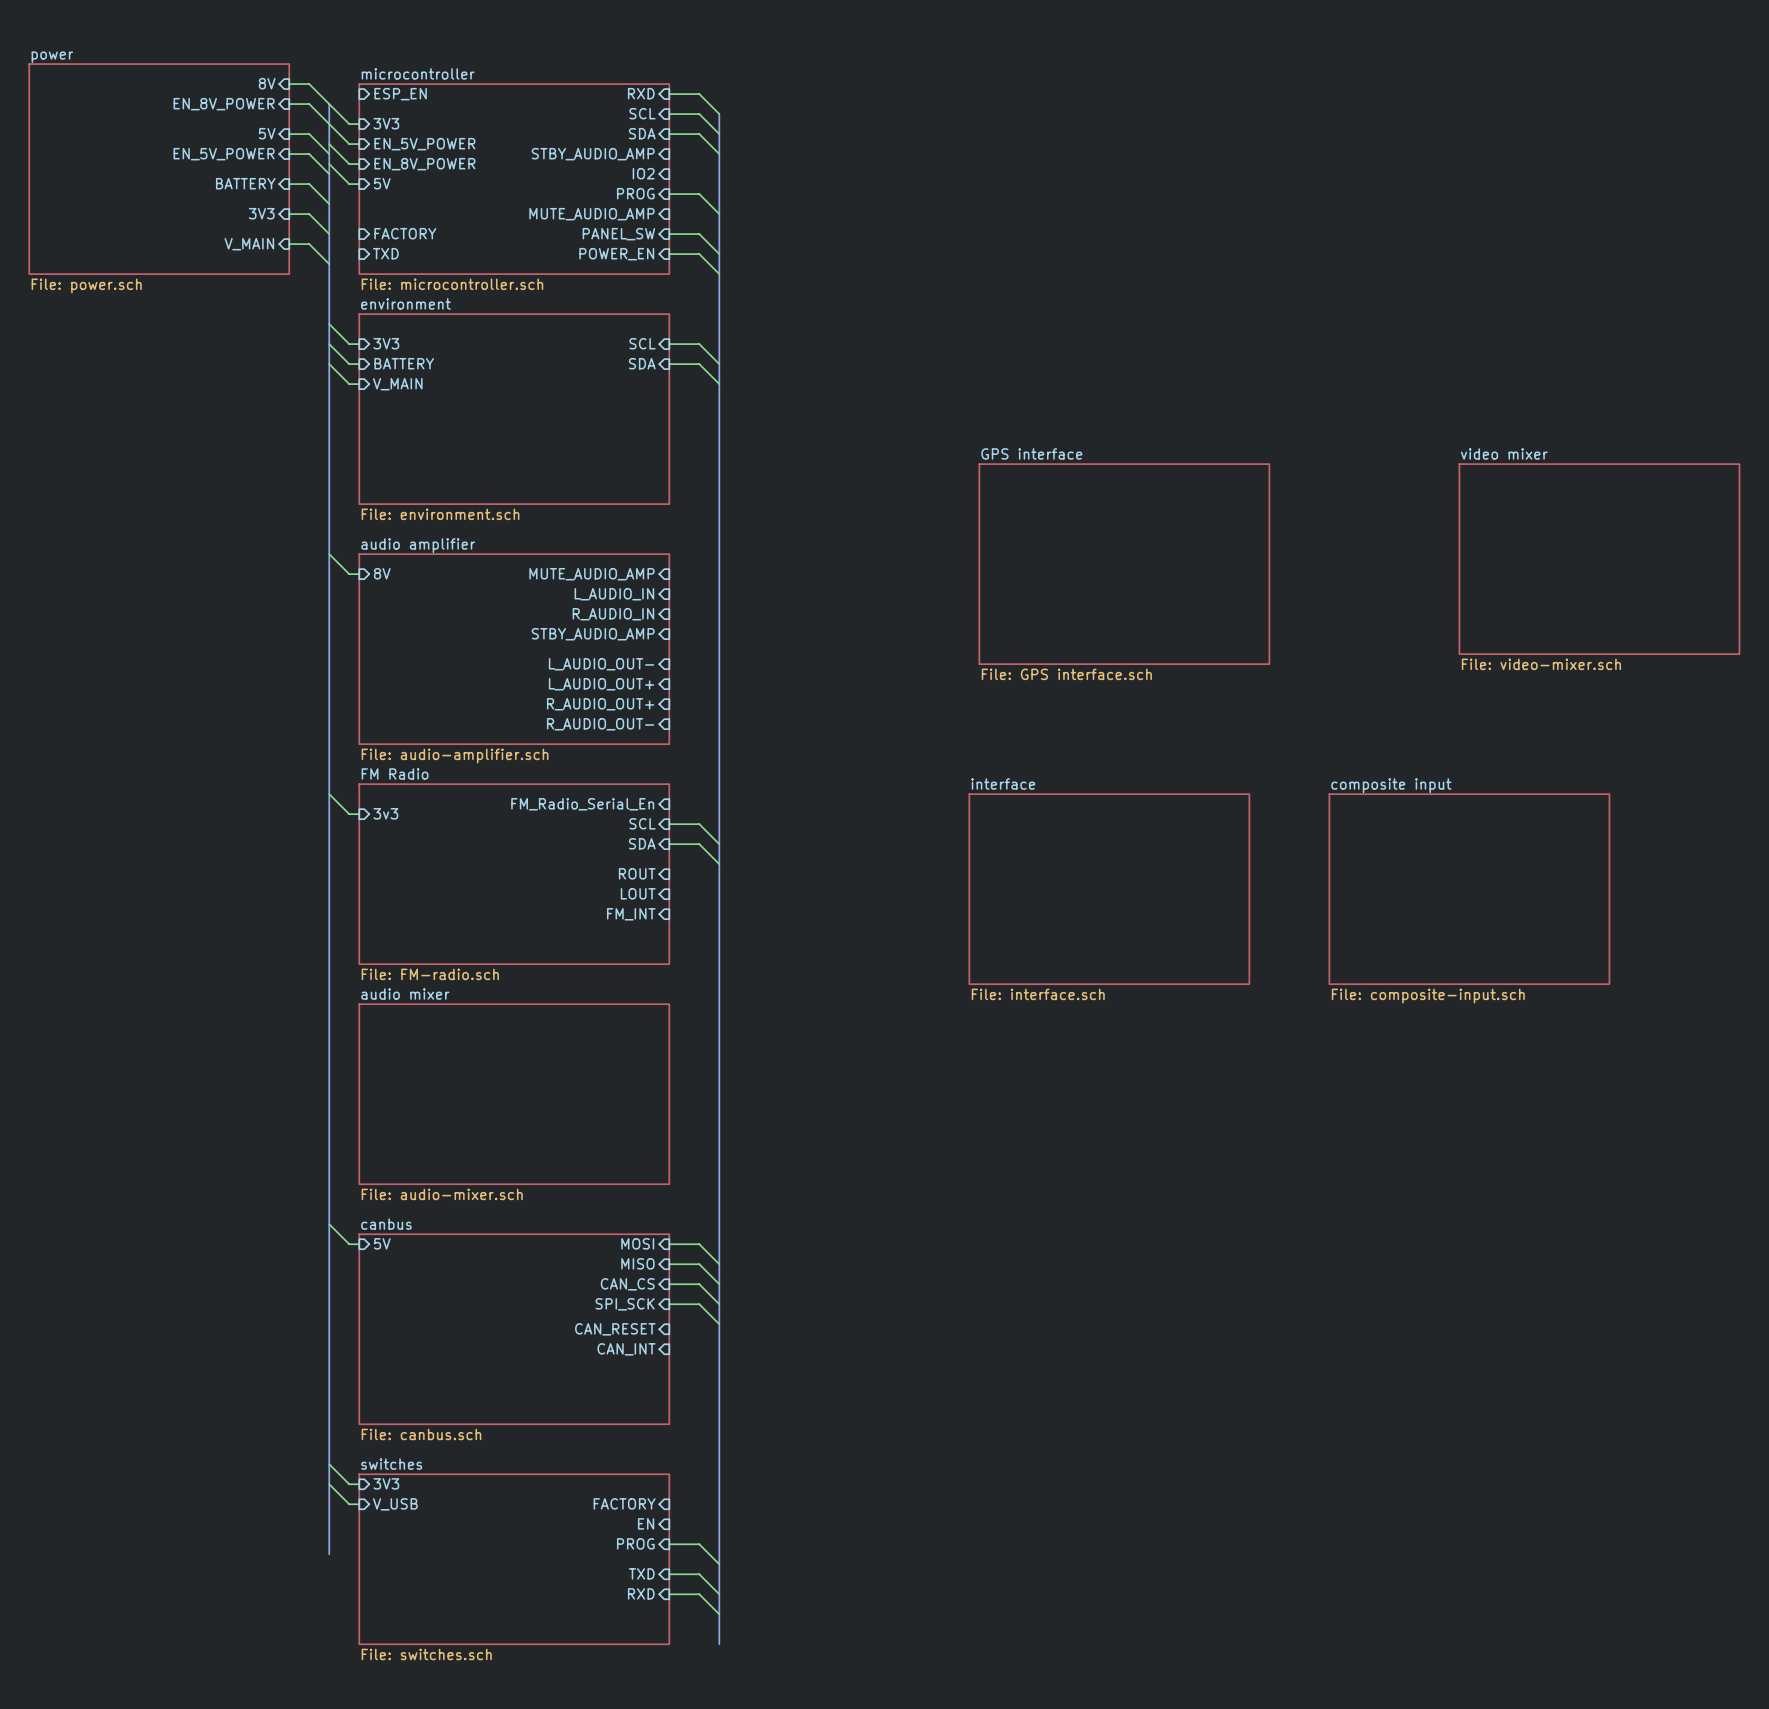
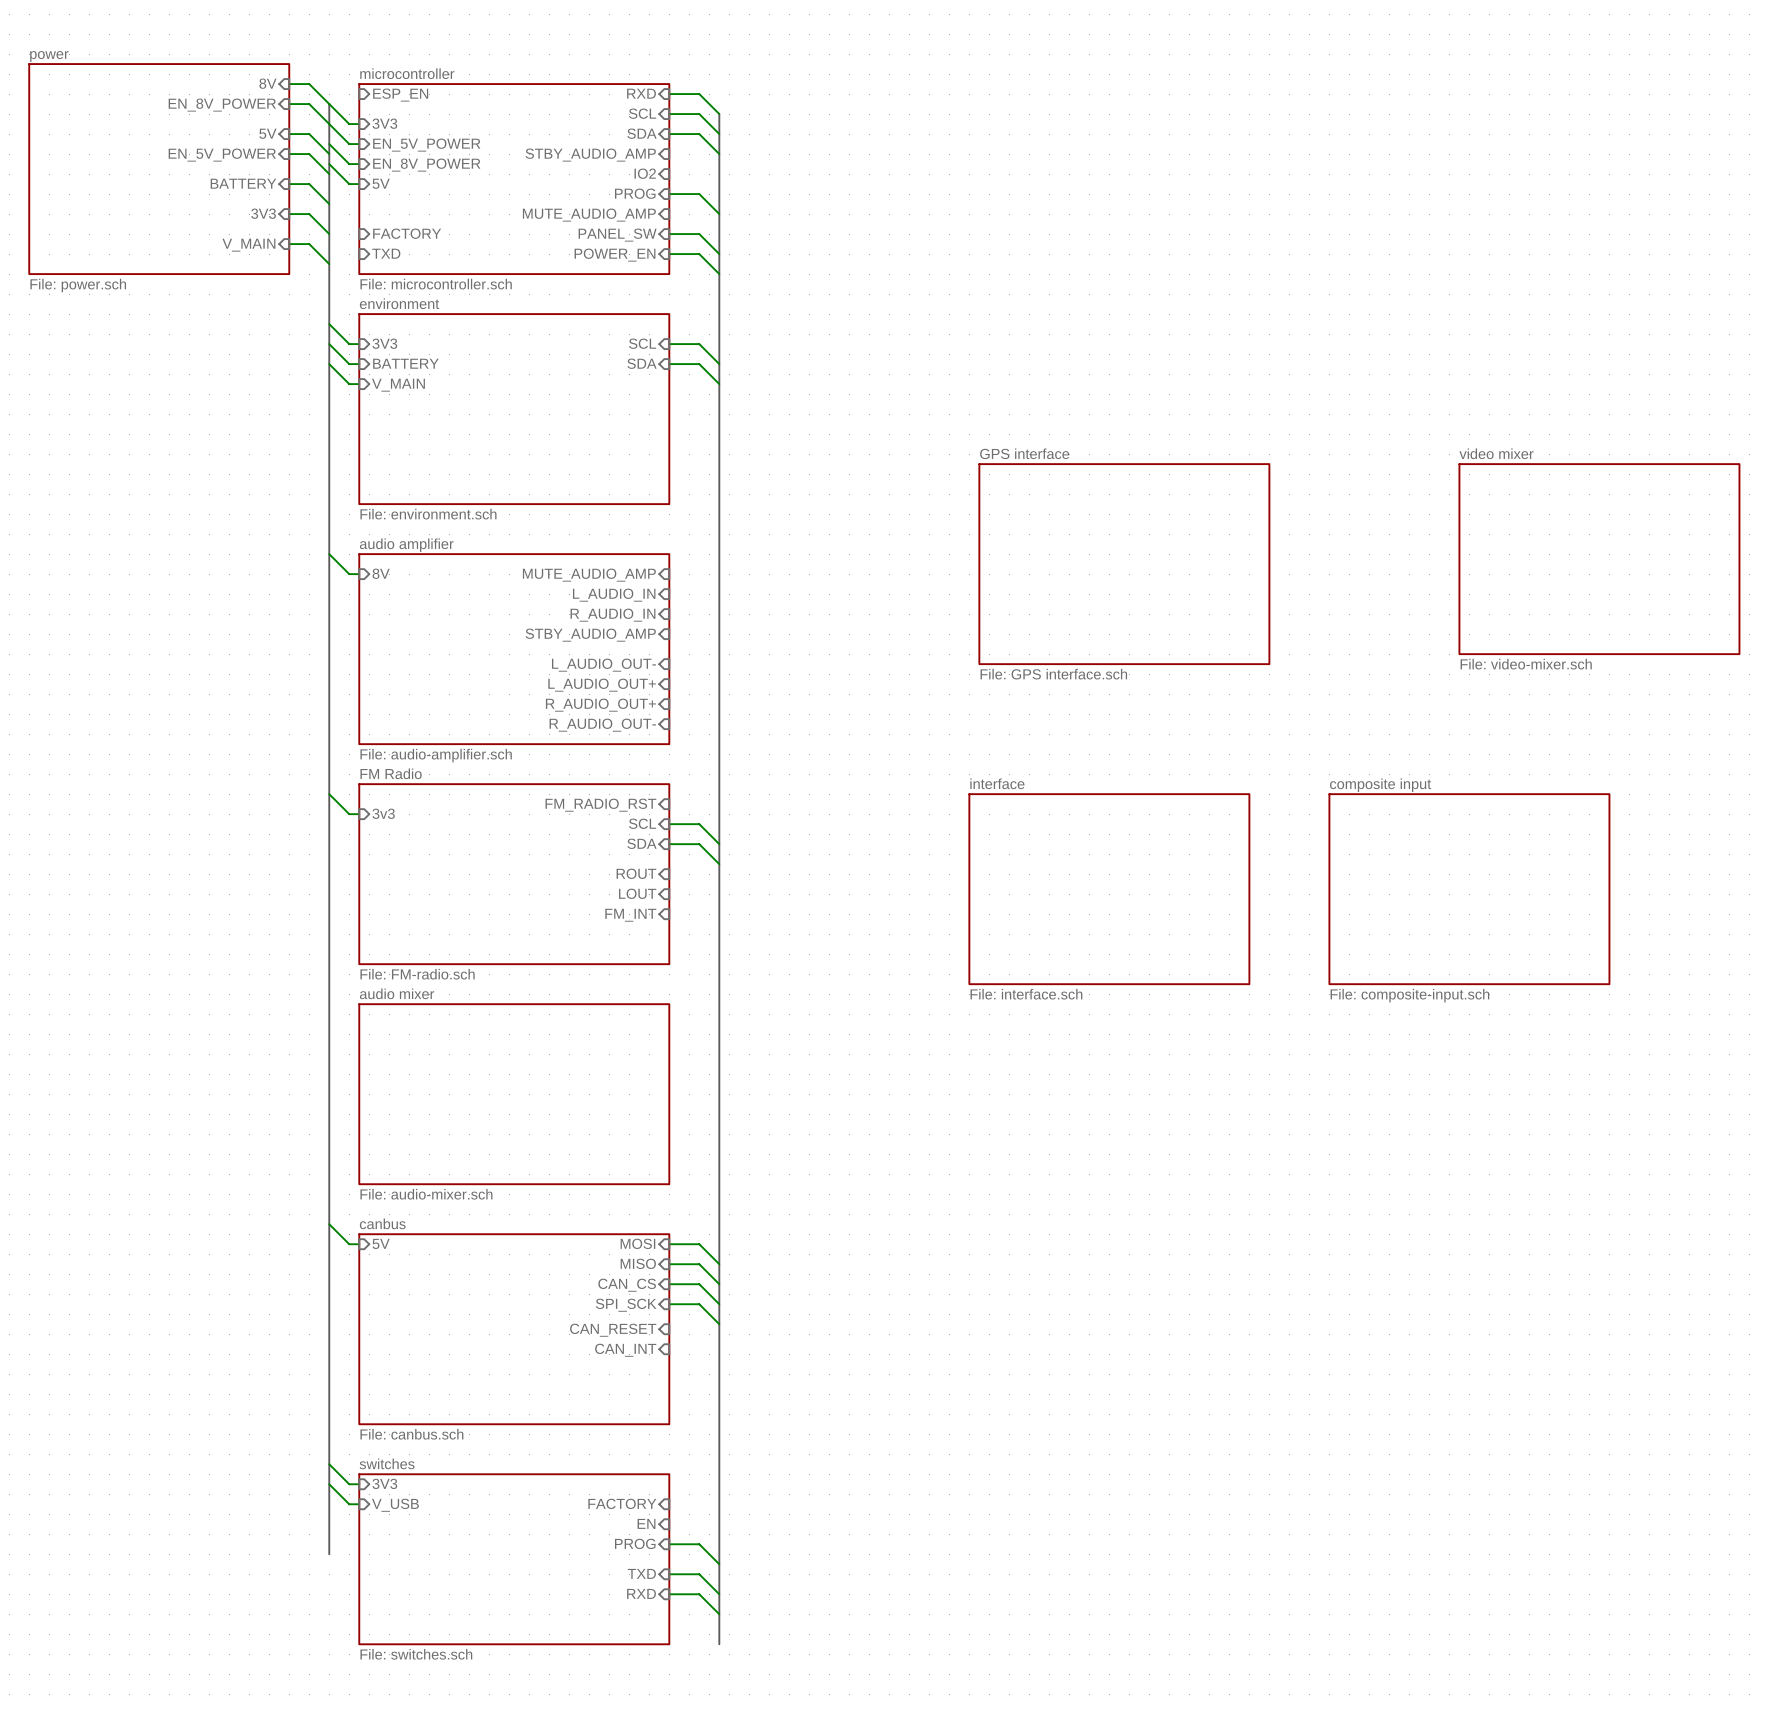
sheet pin: FM_Radio_Serial_En (582, 804) -> FM_RADIO_RST (600, 805)

